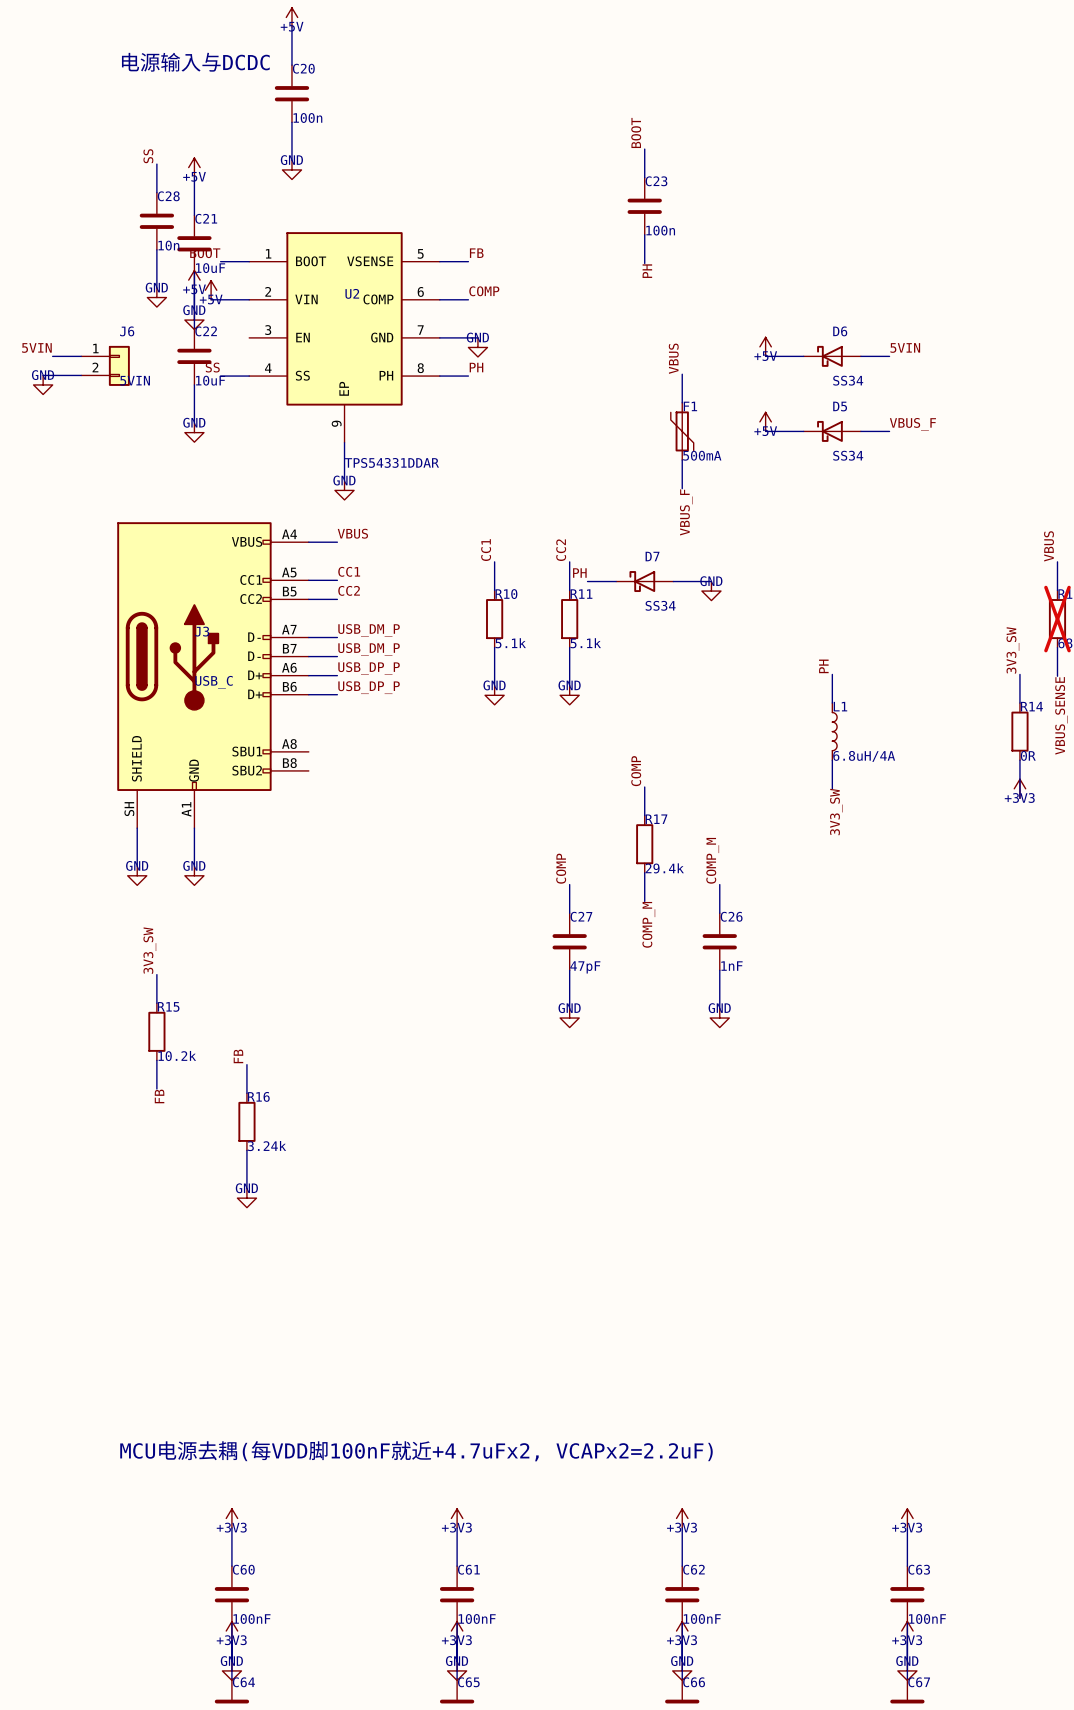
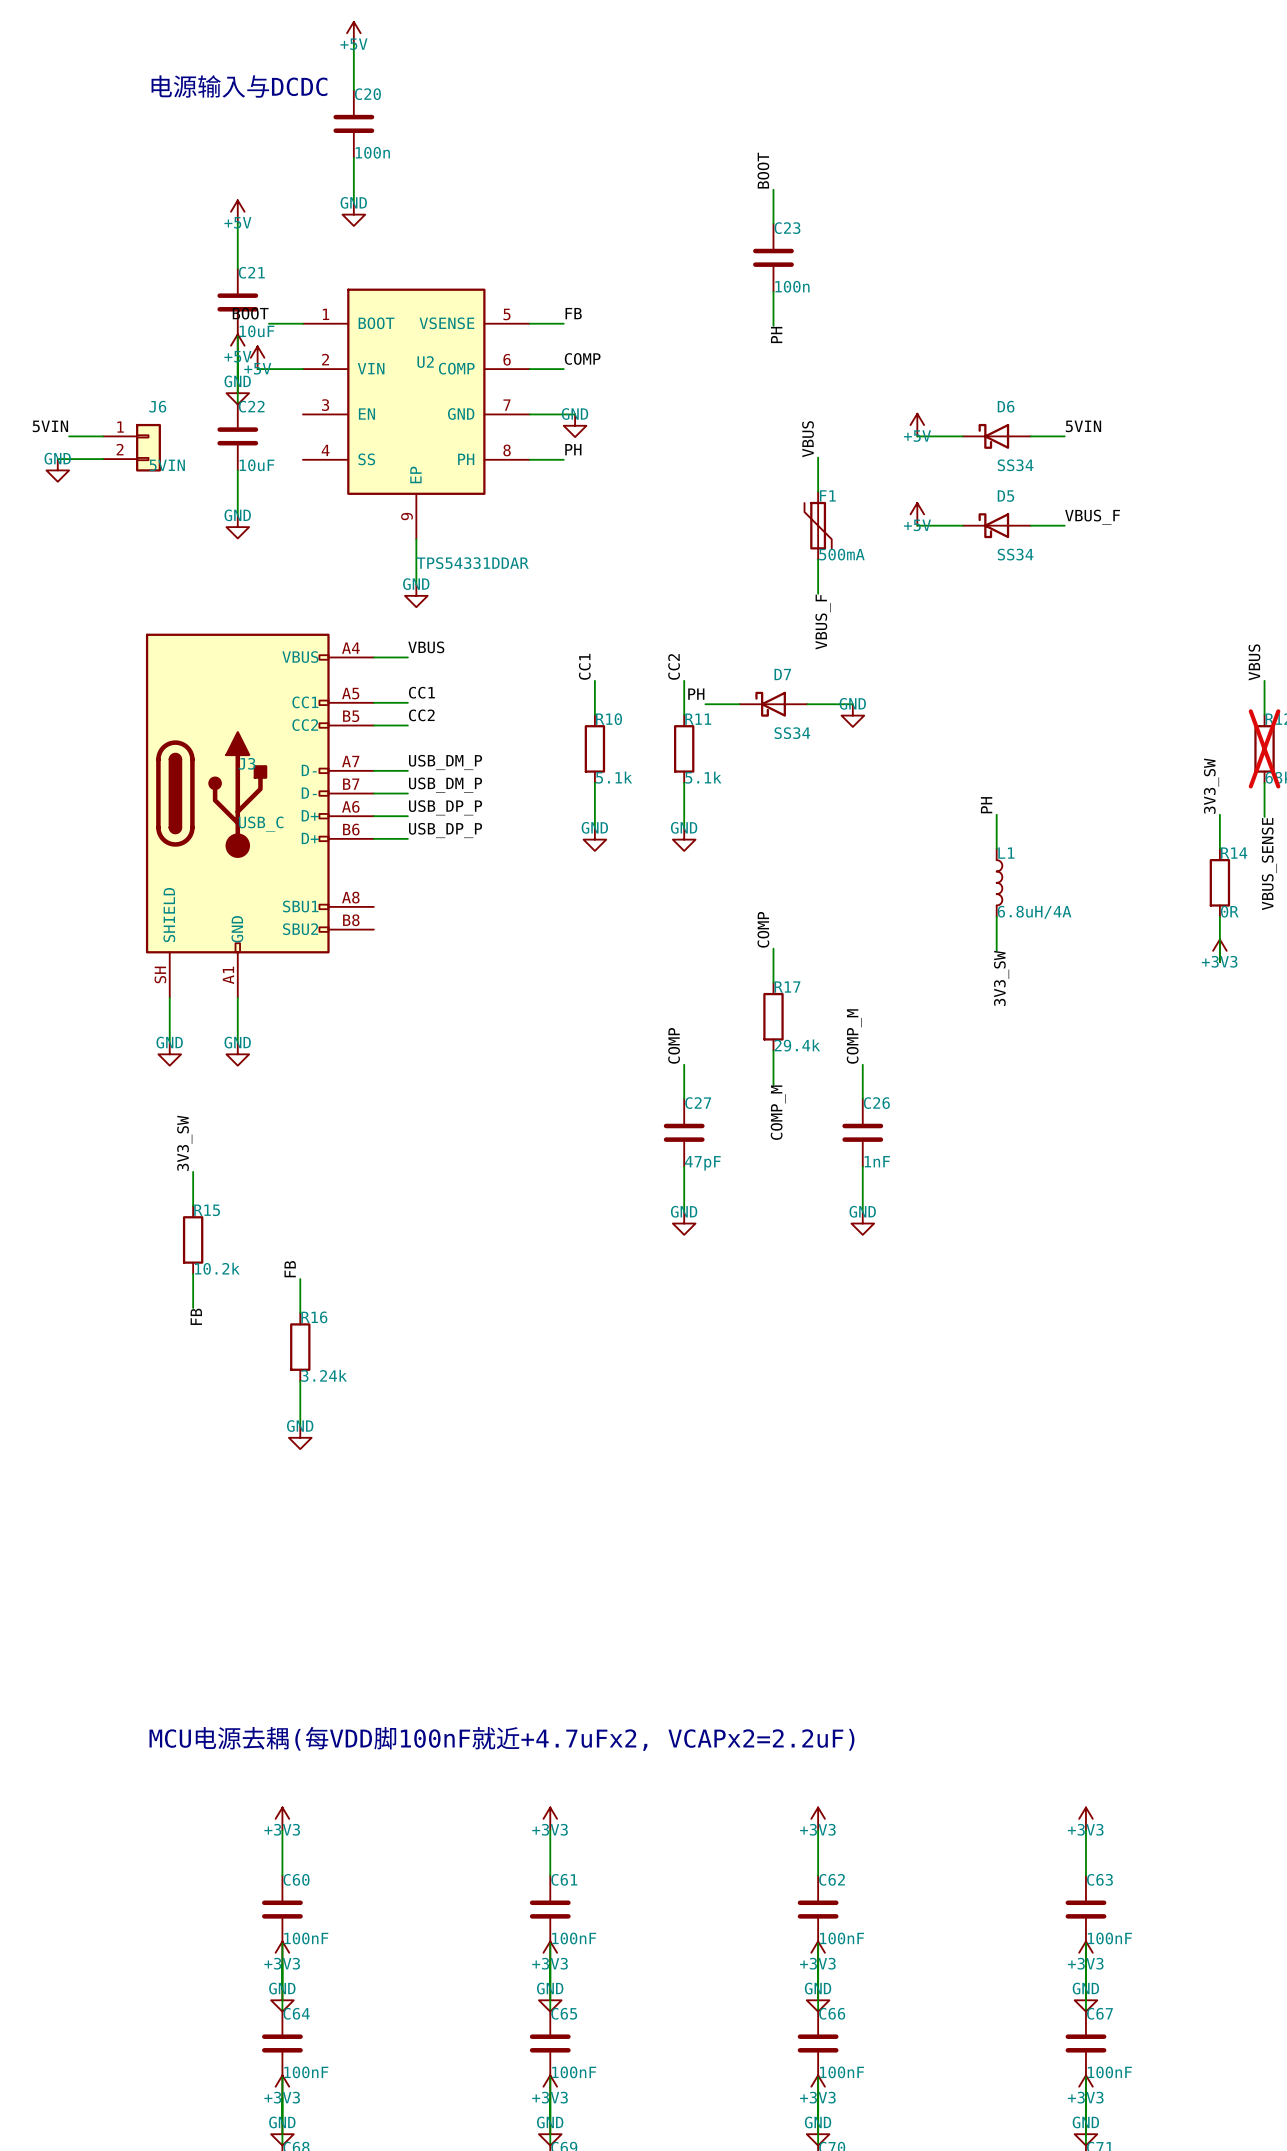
label: SS (148, 156) -> none
wire: (156, 164) (156, 192) -> none
C28: 10n (156, 221) -> none
wire: (156, 249) (156, 288) -> none
power symbol: GND (156, 297) -> none
label: SS (212, 367) -> none
wire: (220, 376) (249, 376) -> none

